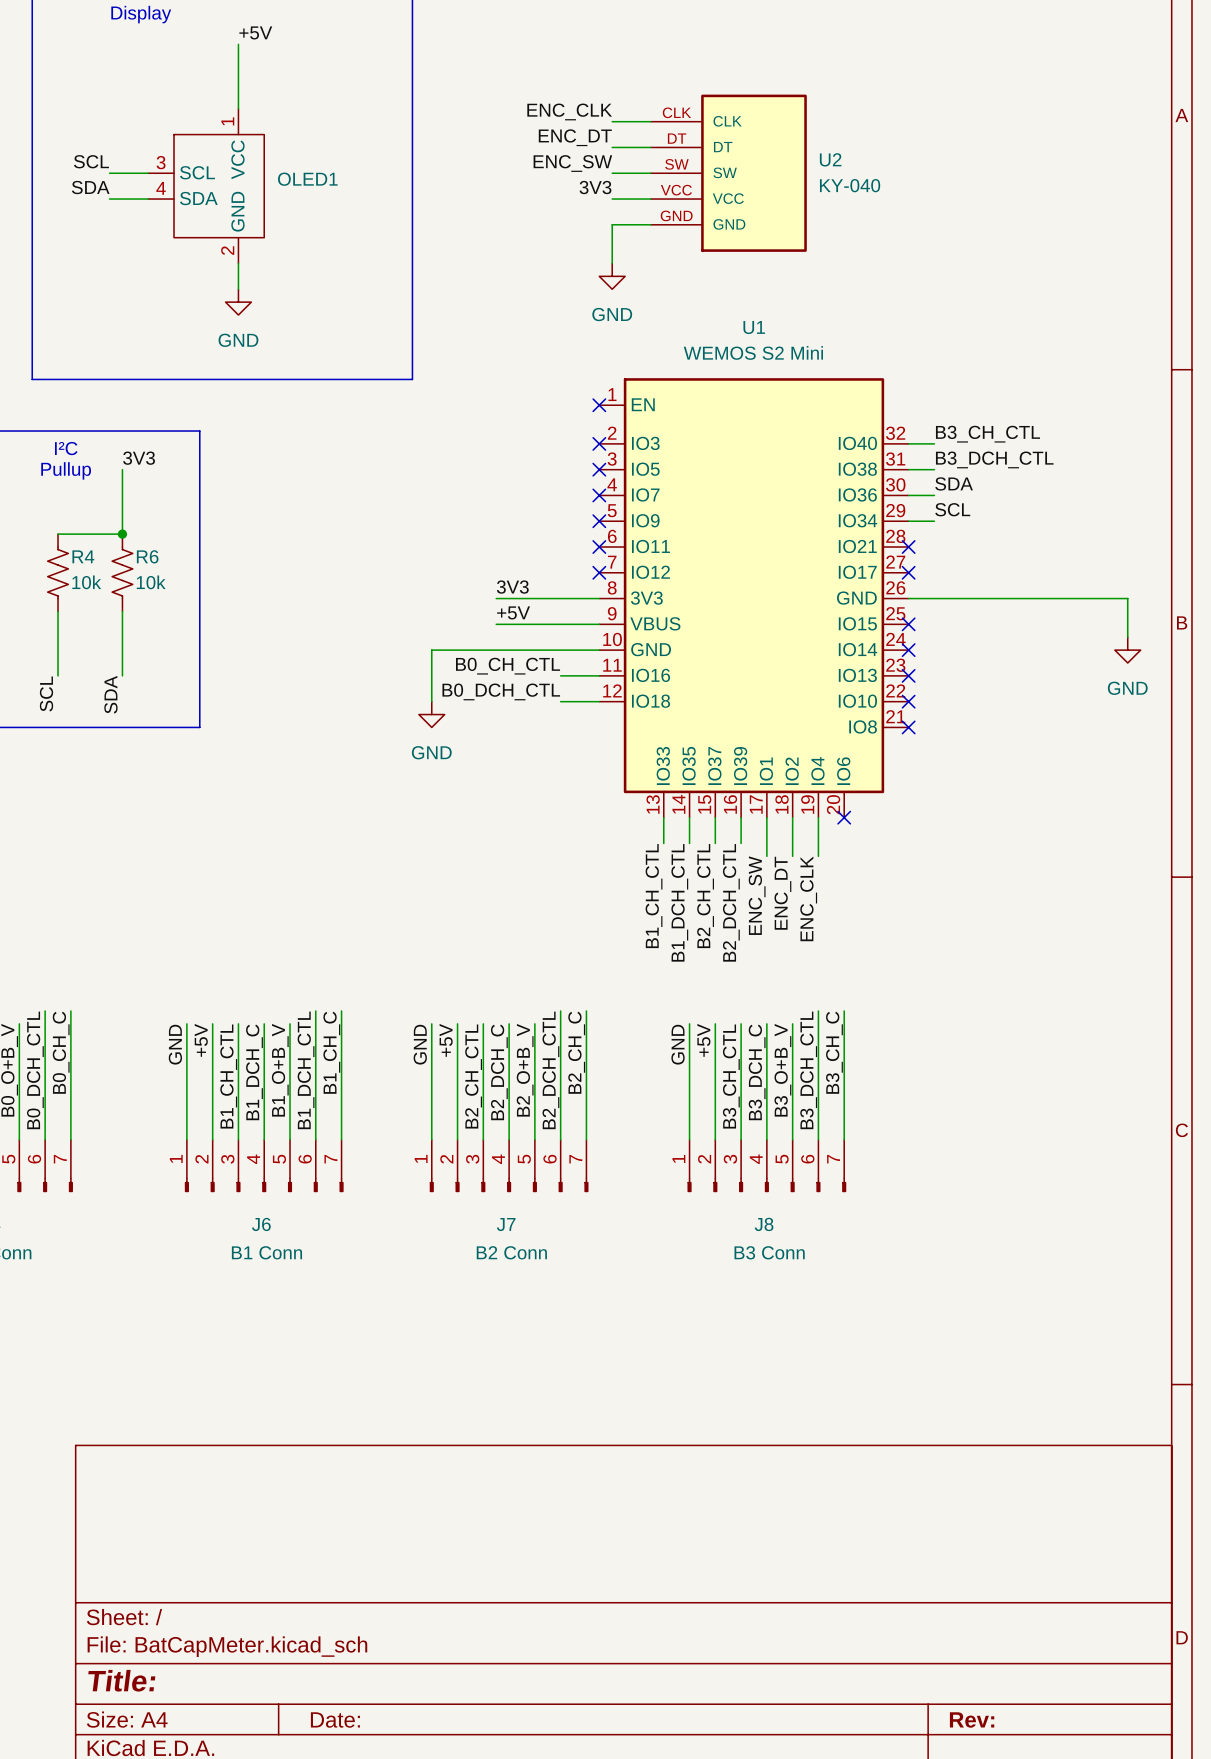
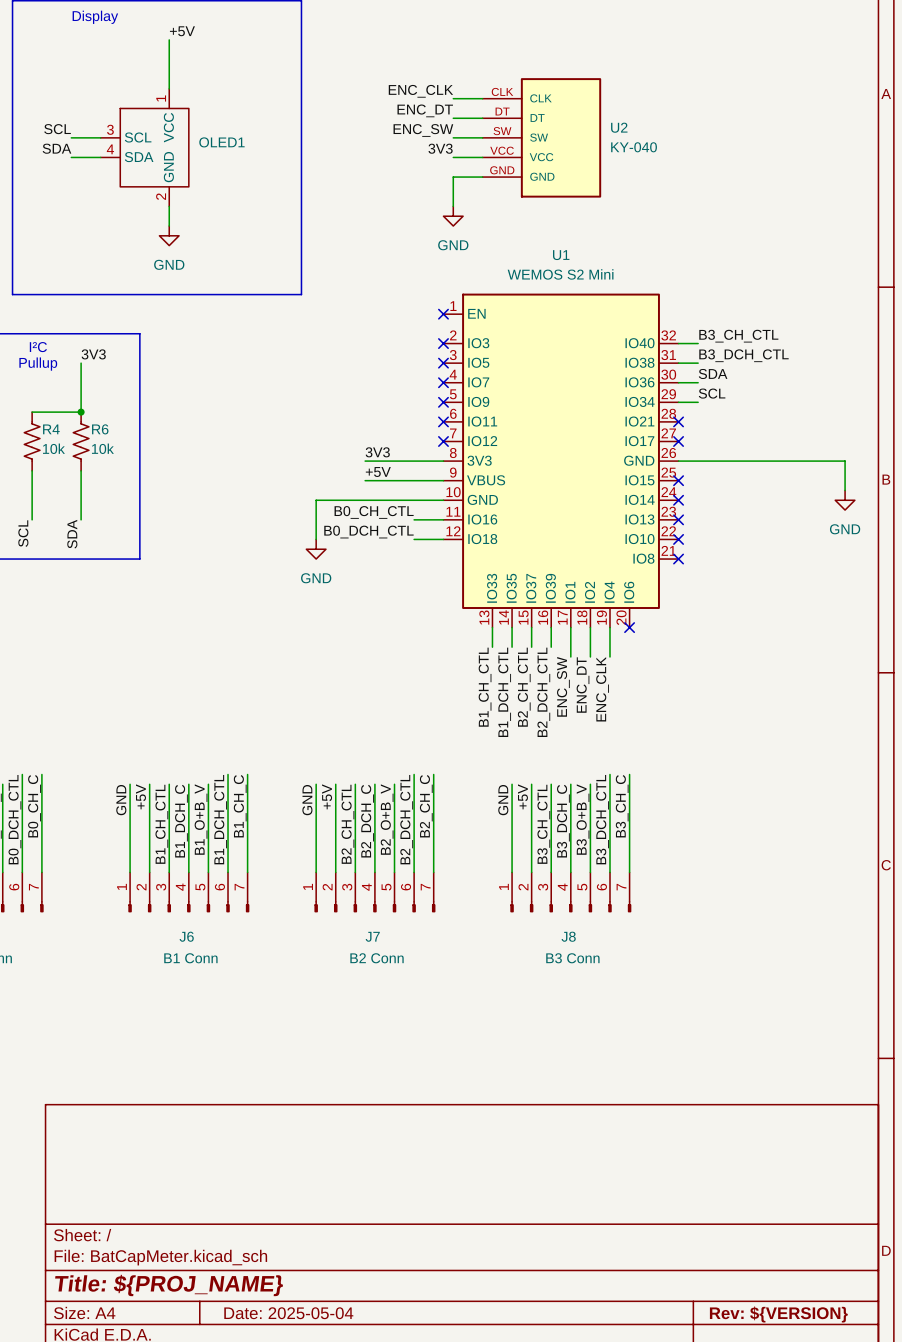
title block: Title: (121, 1680) -> Title: ${PROJ_NAME} (169, 1285)
title block: Date: (335, 1719) -> Date: 2025-05-04 (288, 1313)
title block: Rev: (972, 1719) -> Rev: ${VERSION} (778, 1314)

